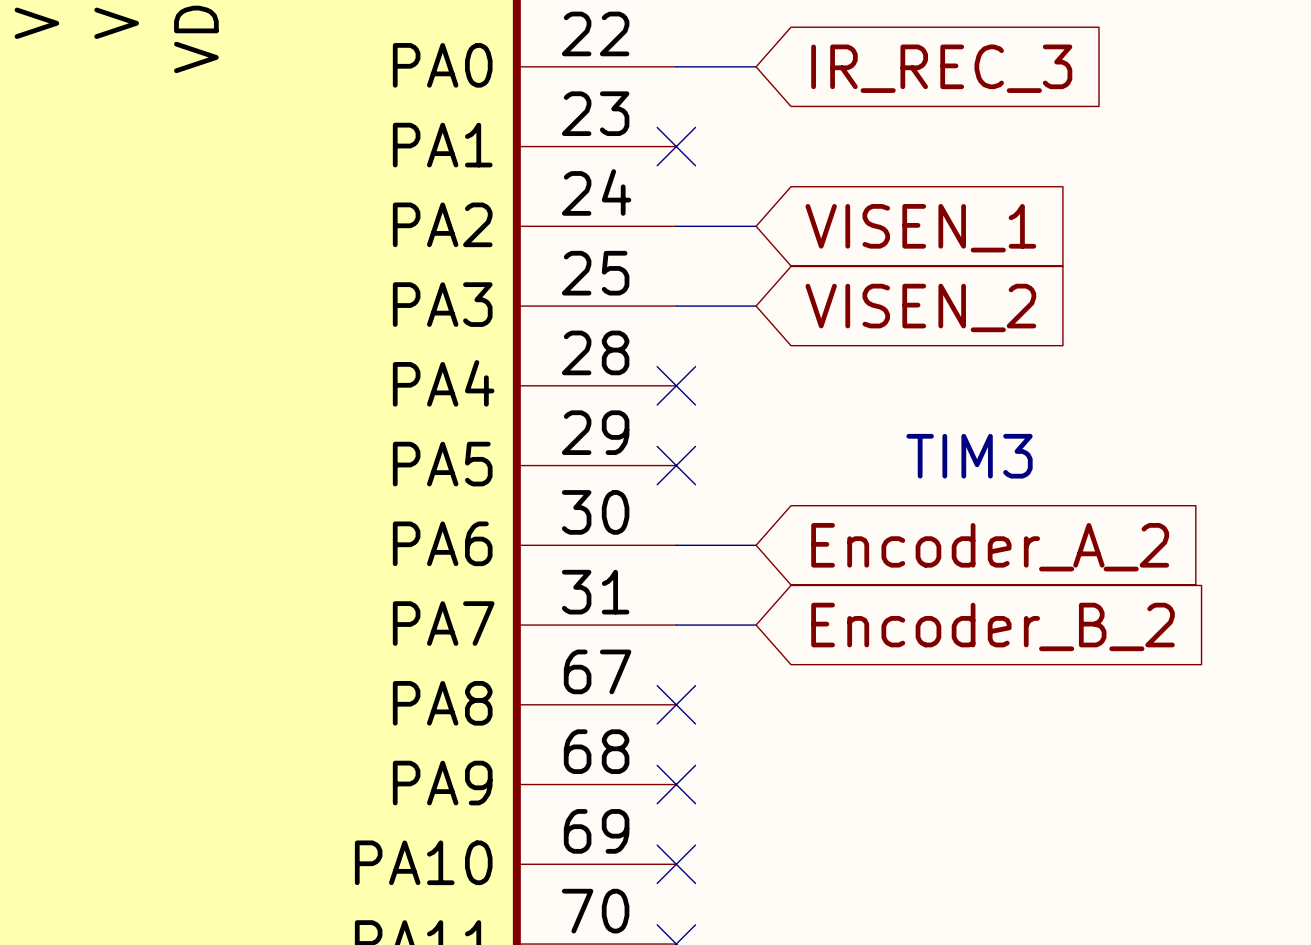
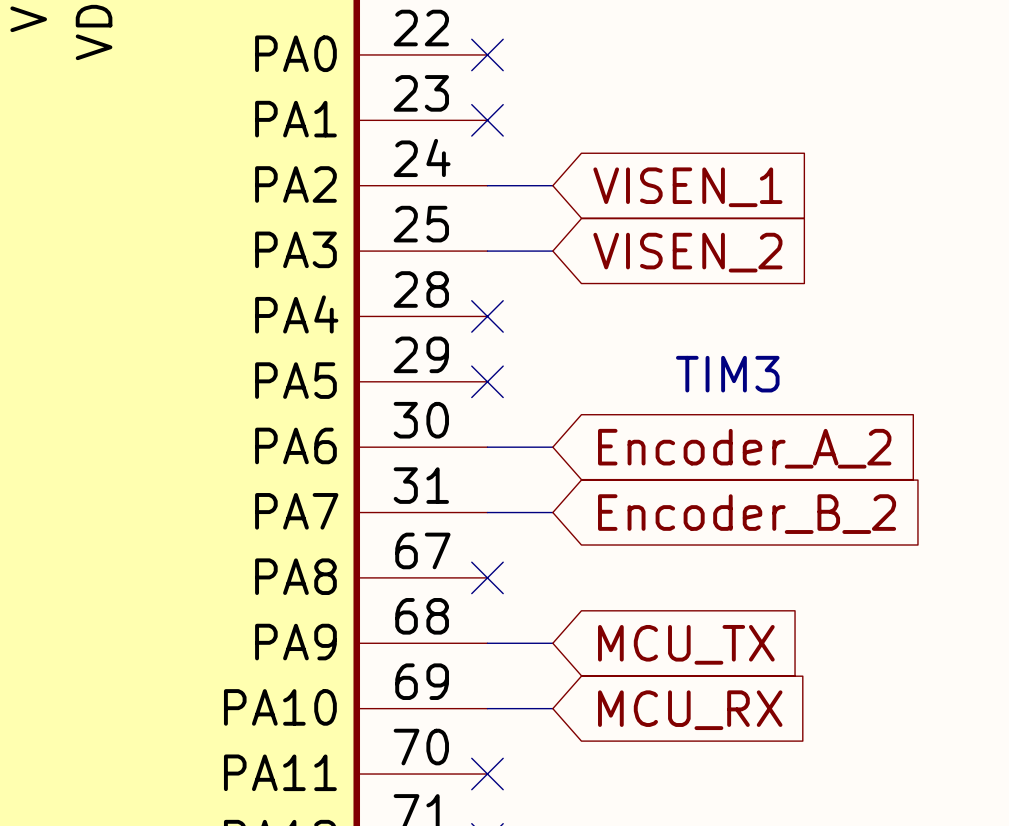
wire: (676, 66) (756, 66) -> (487, 643) (552, 643)
no-connect mark: none -> (487, 54)
global label: IR_REC_3 (941, 68) -> none
no-connect mark: (676, 784) -> none
global label: none -> MCU_TX (686, 644)
wire: none -> (487, 708) (552, 708)
no-connect mark: (676, 864) -> none
global label: none -> MCU_RX (690, 710)

